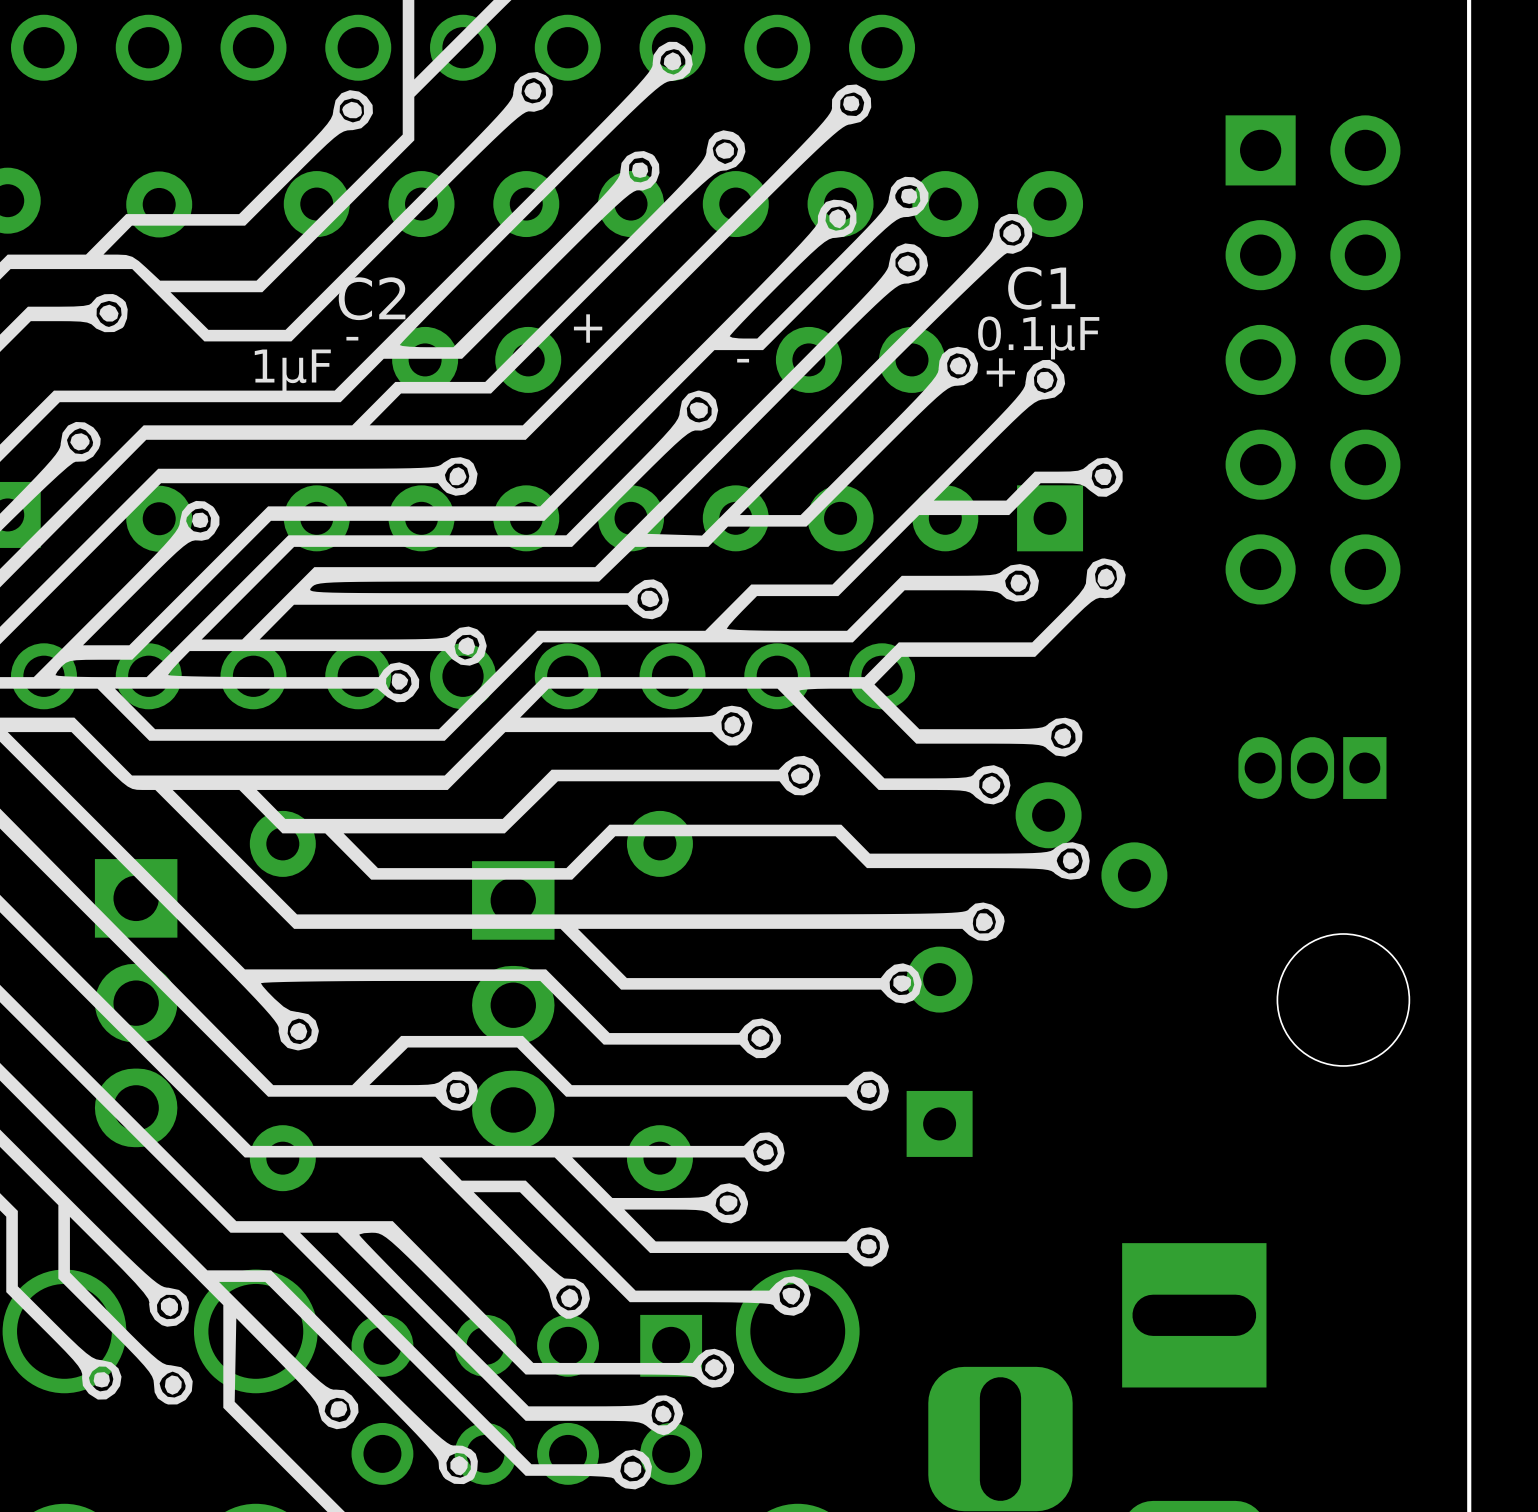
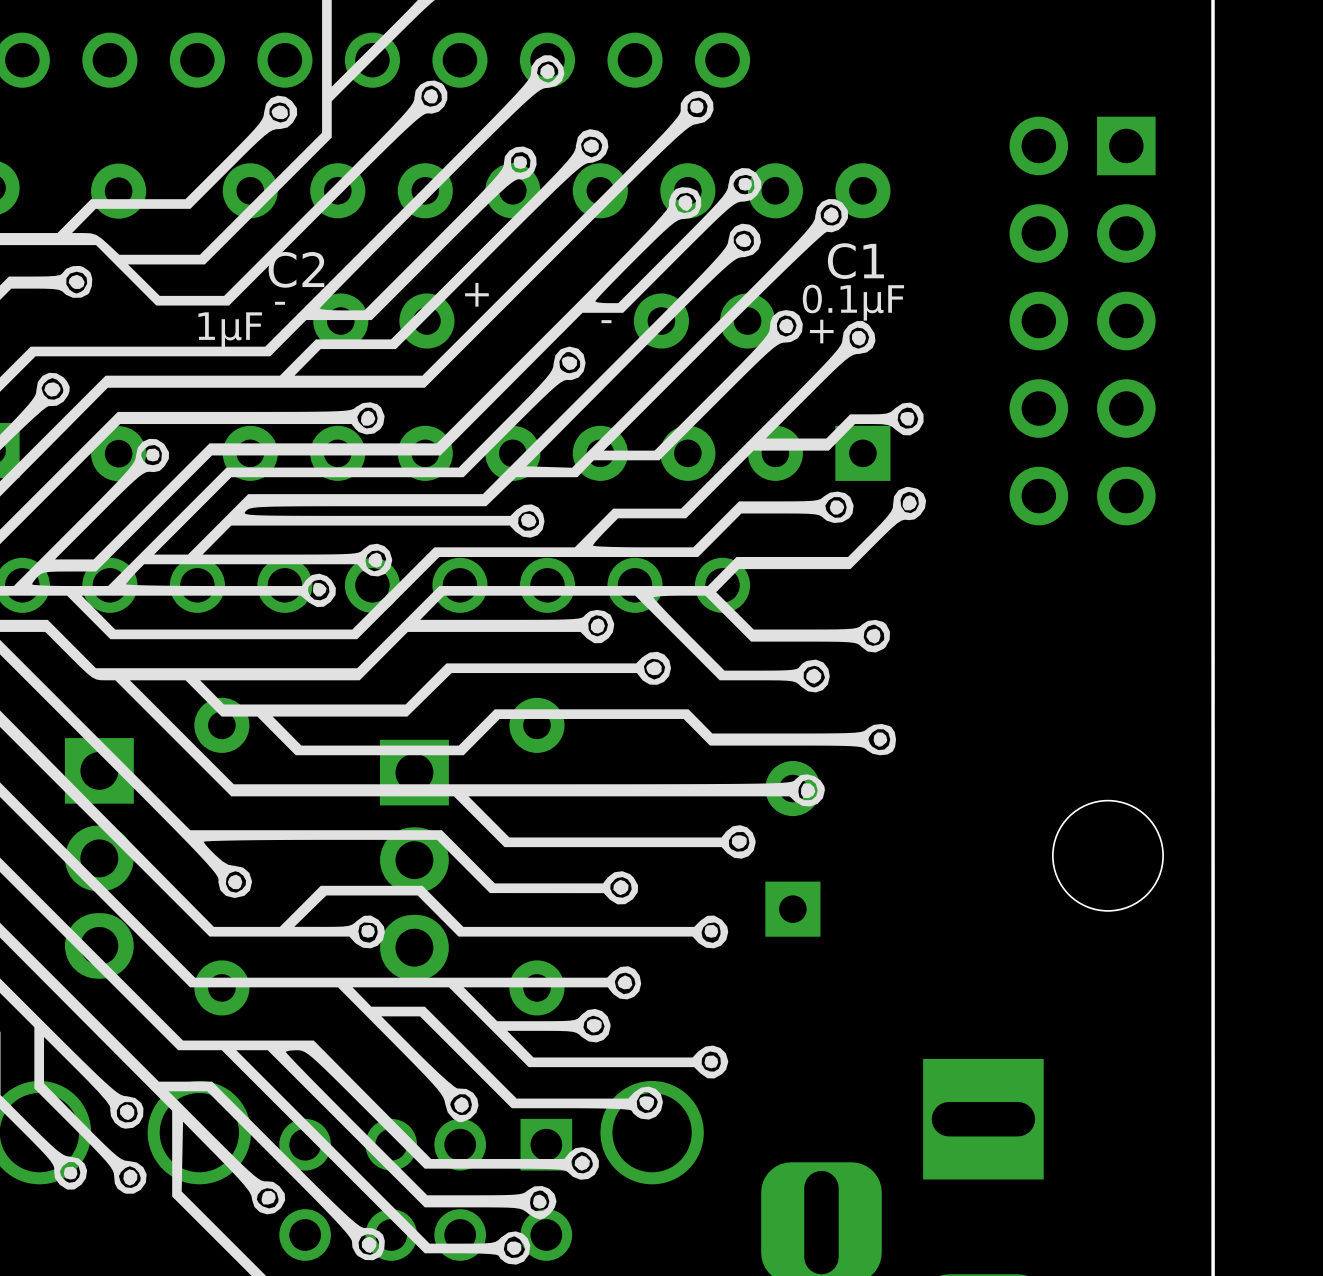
part footprint: [1225, 115, 1401, 605] -> [1009, 116, 1156, 526]
part: (1312, 768) -> none
part: (1091, 845) -> none
part position: (939, 1051) -> (792, 848)

